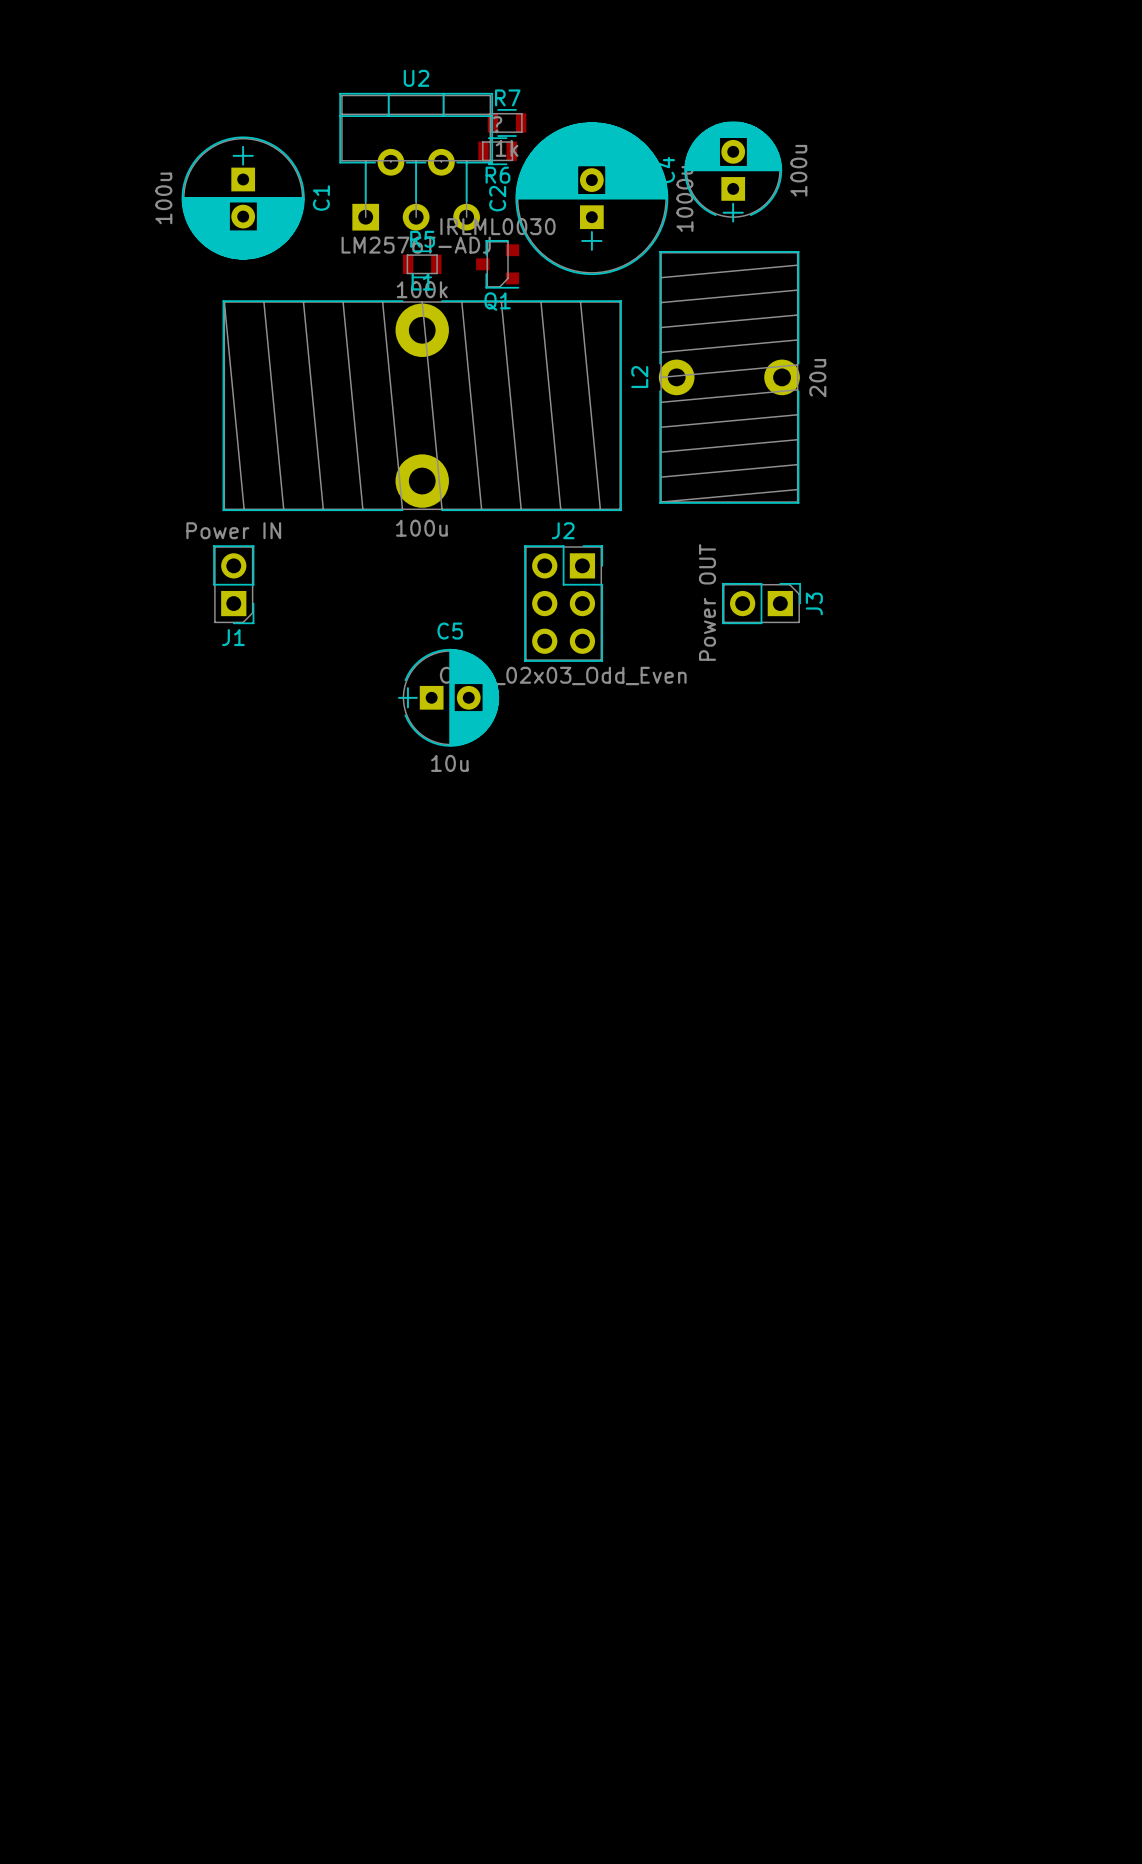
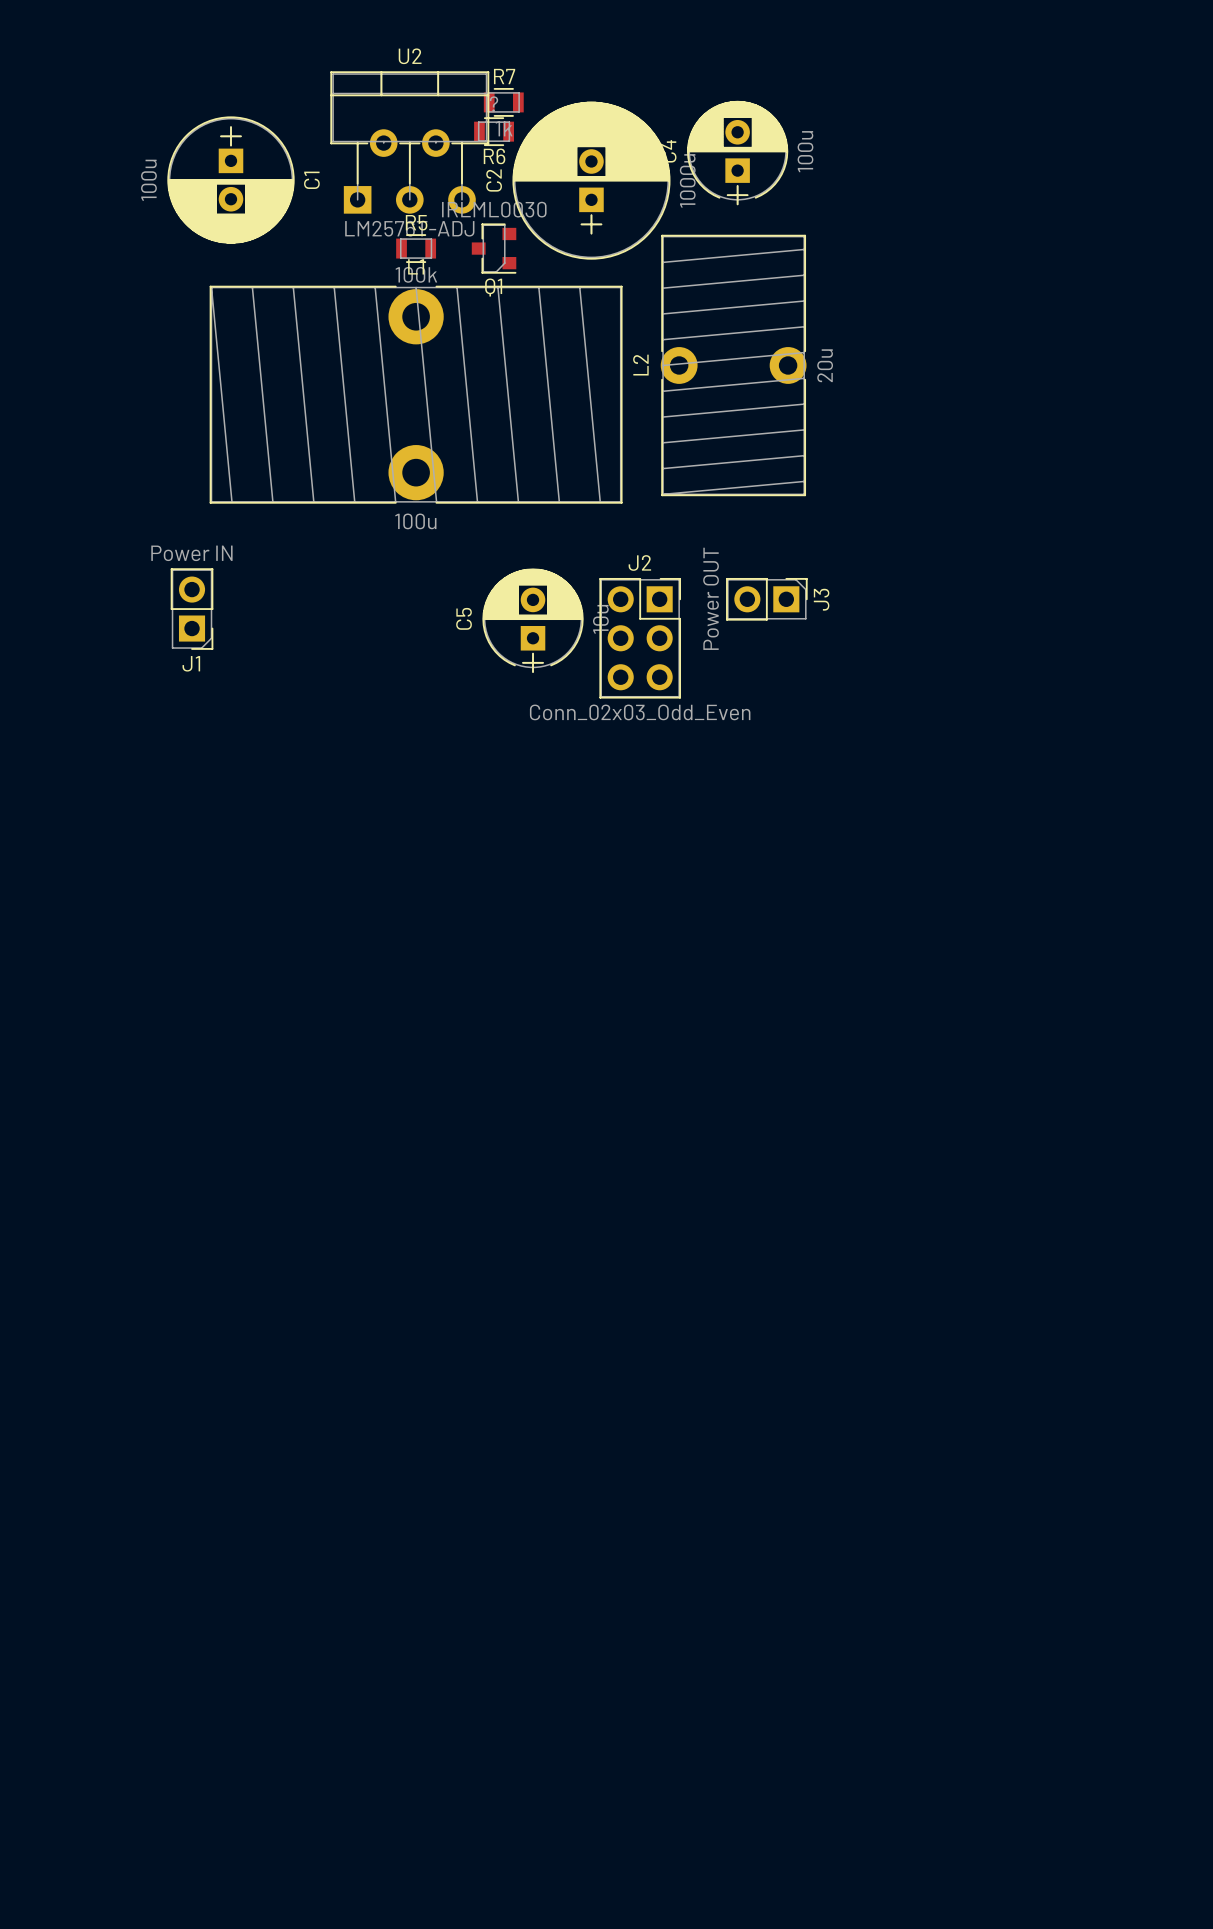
J1 position: (233, 584) -> (192, 609)
J2 position: (563, 603) -> (640, 638)
C5 rotation: 0° (448, 697) -> 90° counterclockwise (533, 620)
C5 position: (448, 697) -> (533, 620)

